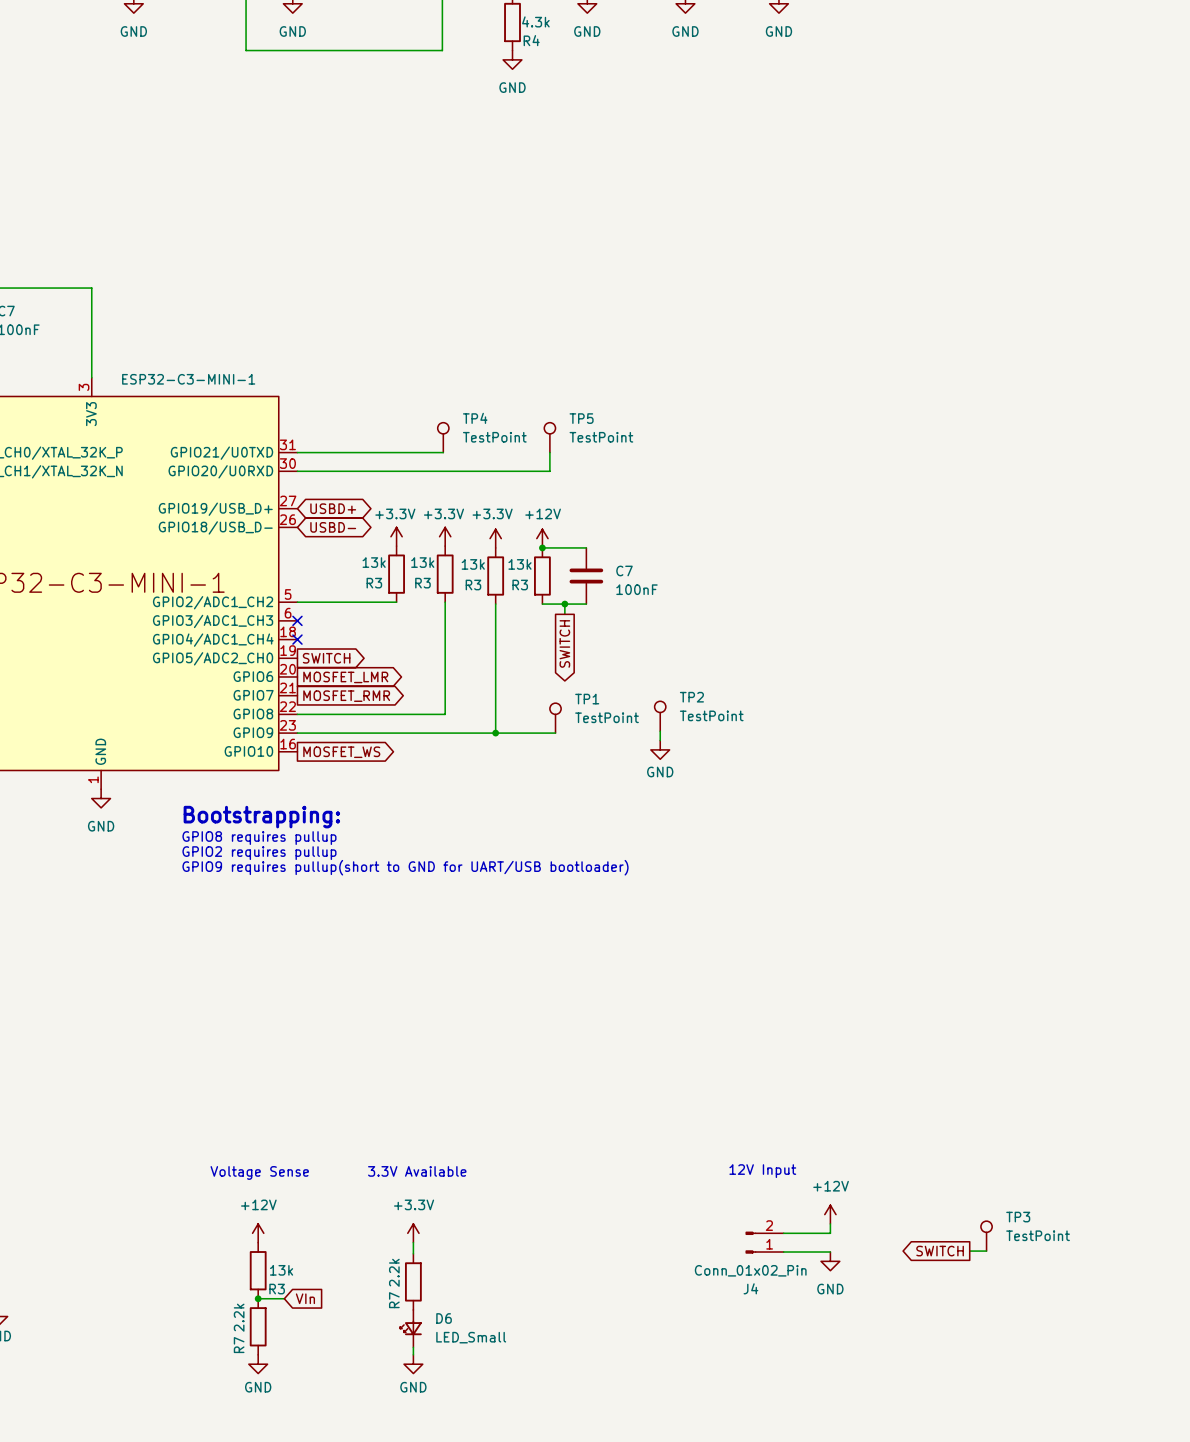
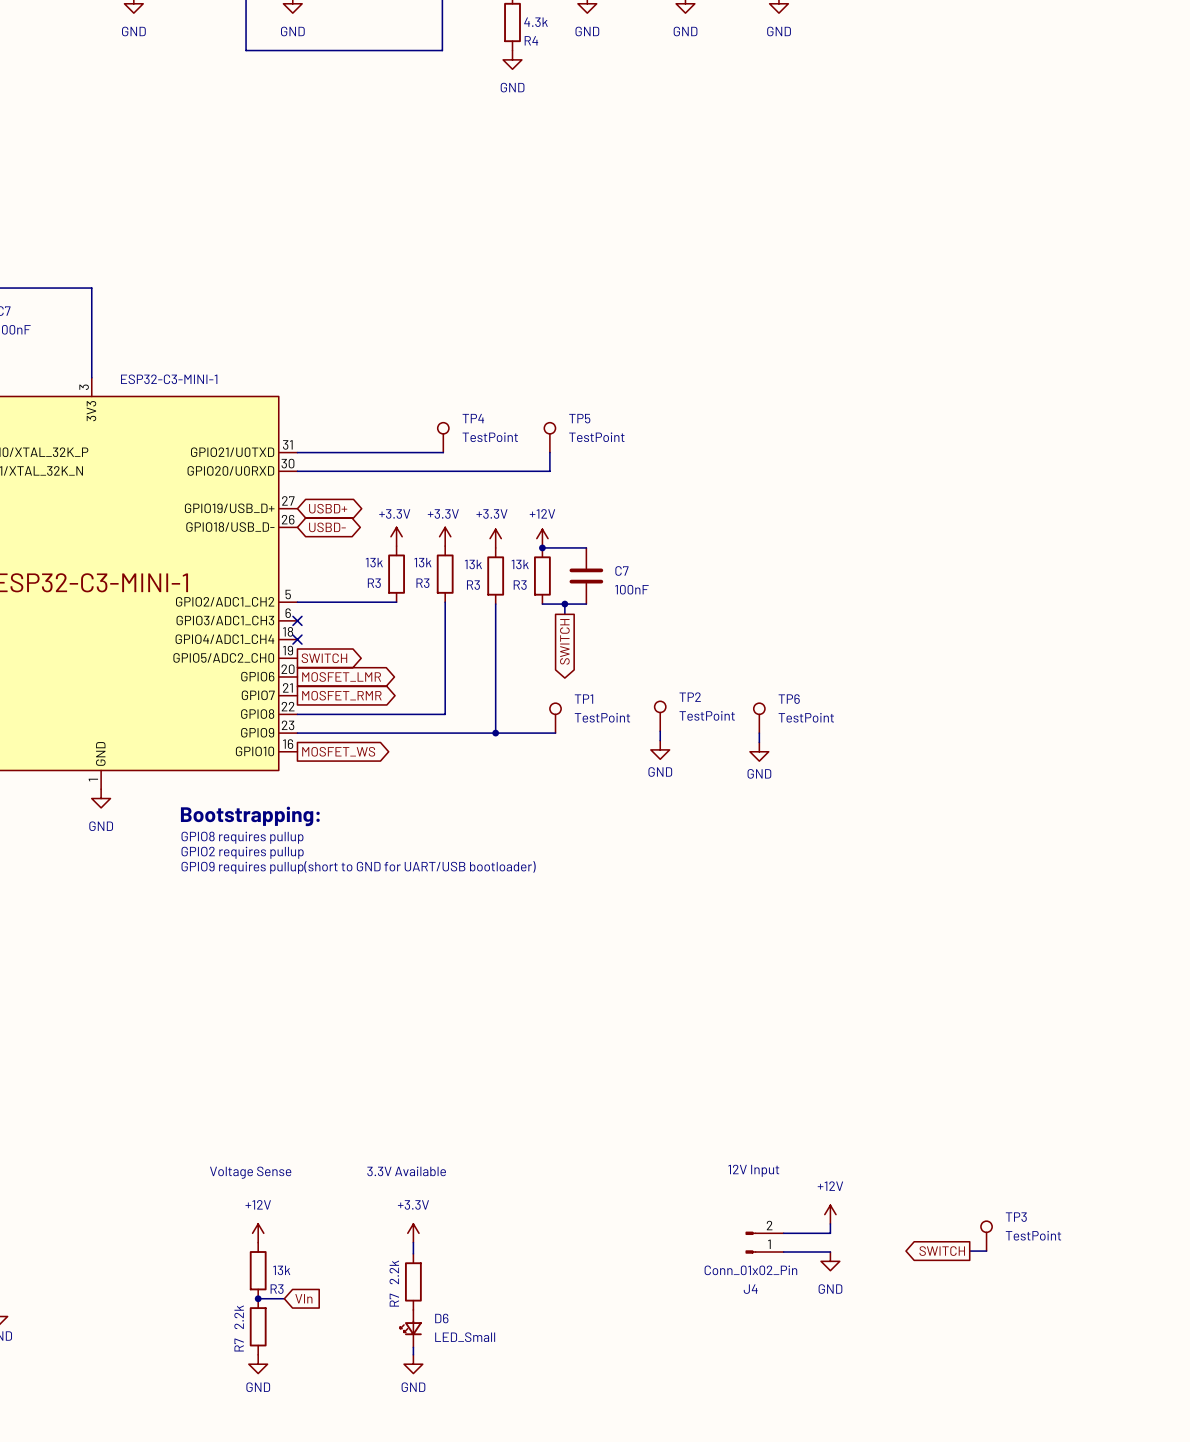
TP6: none -> TestPoint (759, 718)
wire: none -> (759, 733) (759, 742)
power symbol: none -> GND (759, 751)

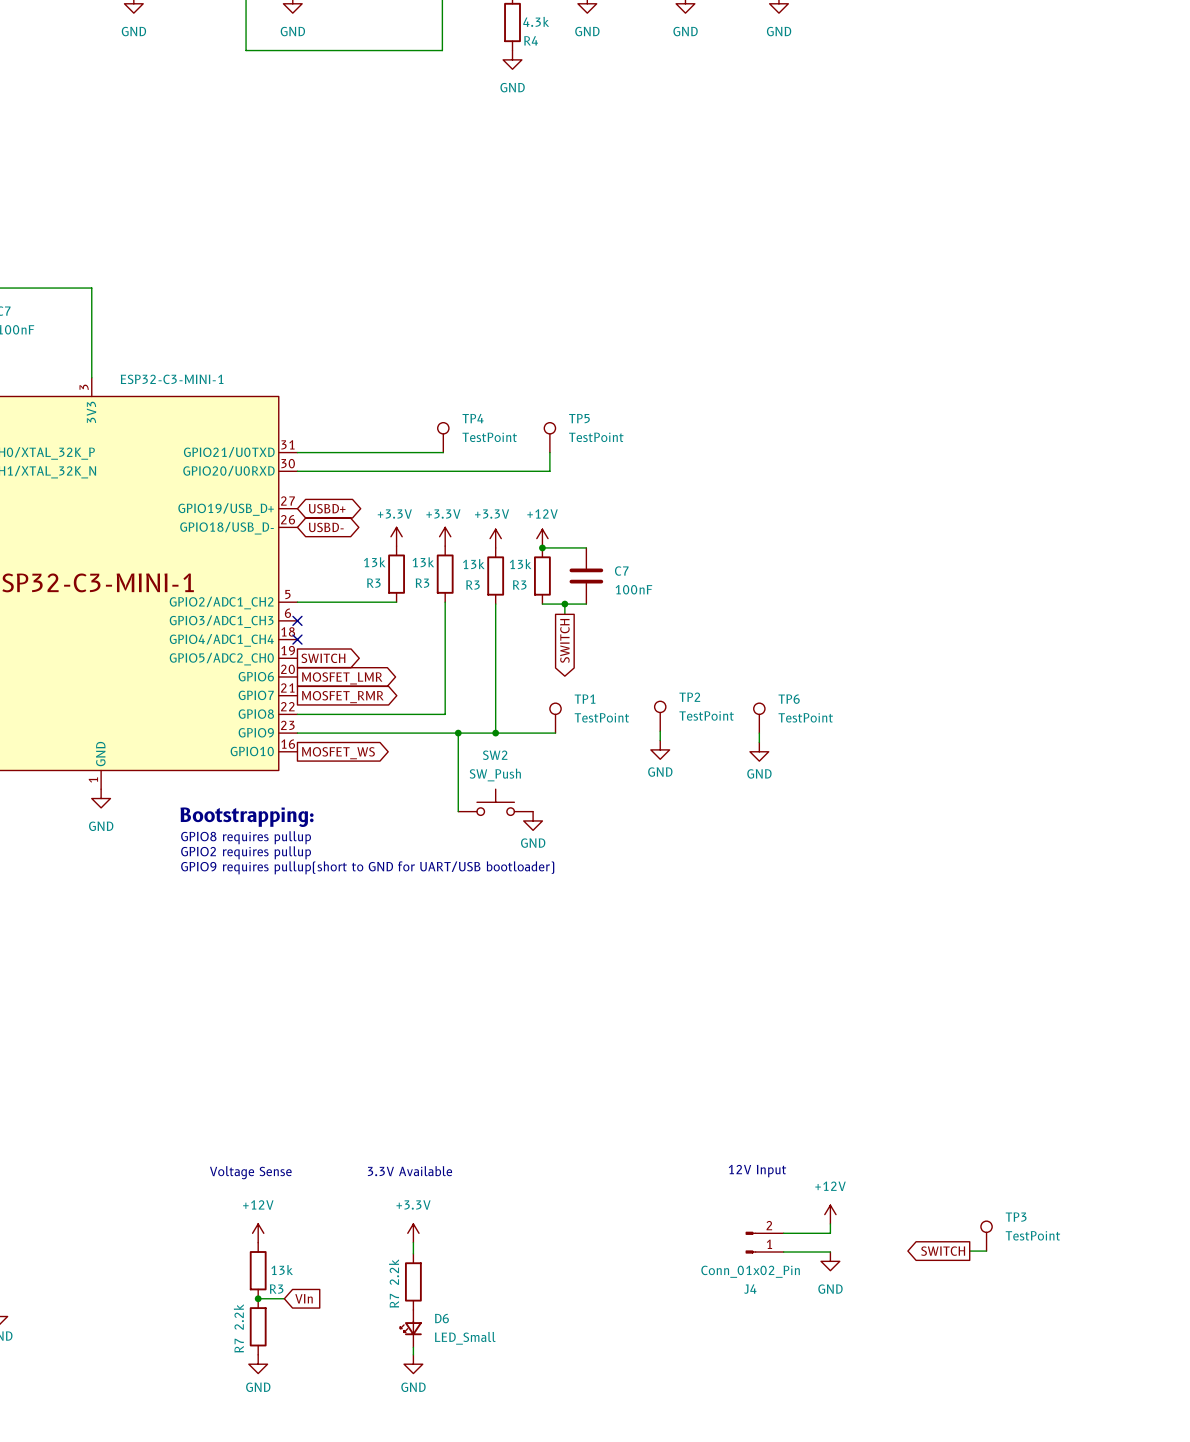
wire: none -> (458, 733) (458, 811)
junction: none -> (458, 733)
SW2: none -> SW_Push (495, 802)
power symbol: none -> GND (533, 820)

